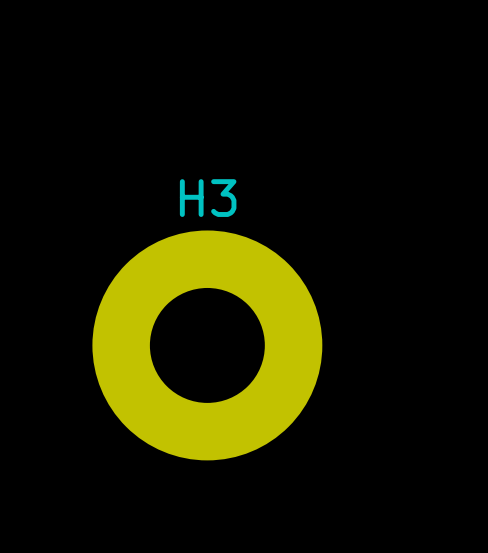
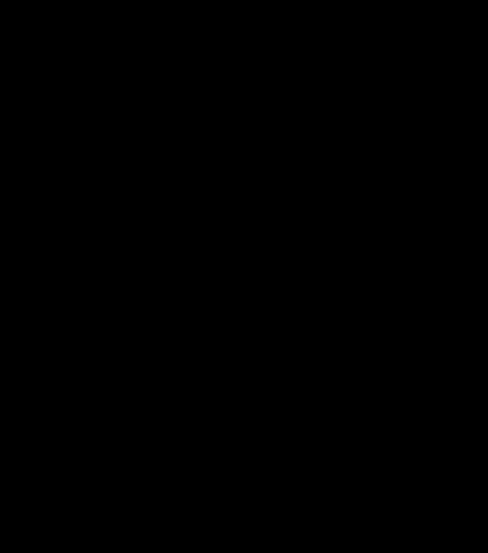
H3: (207, 345) -> none

